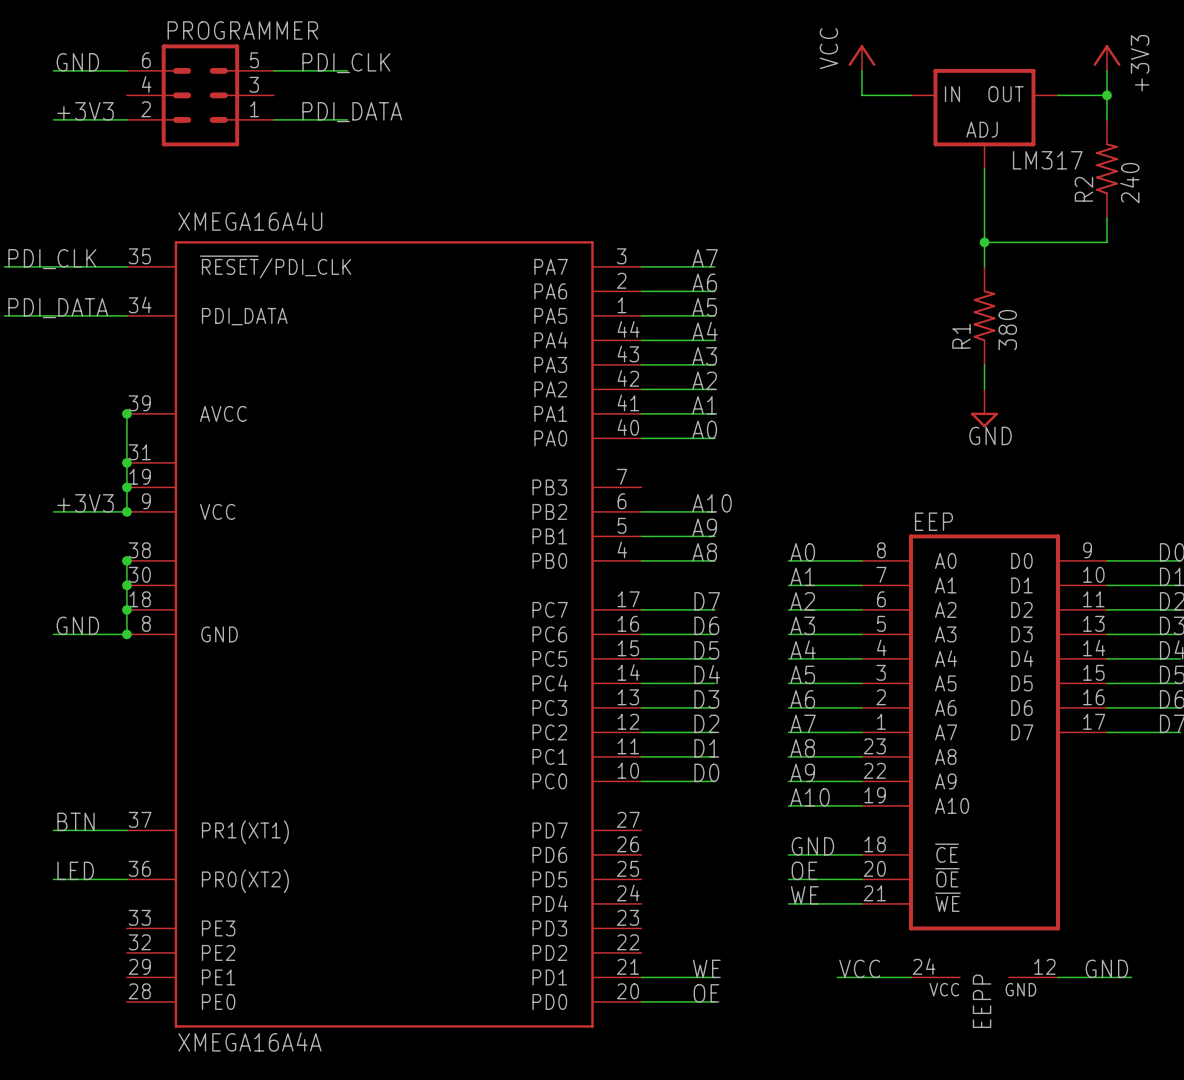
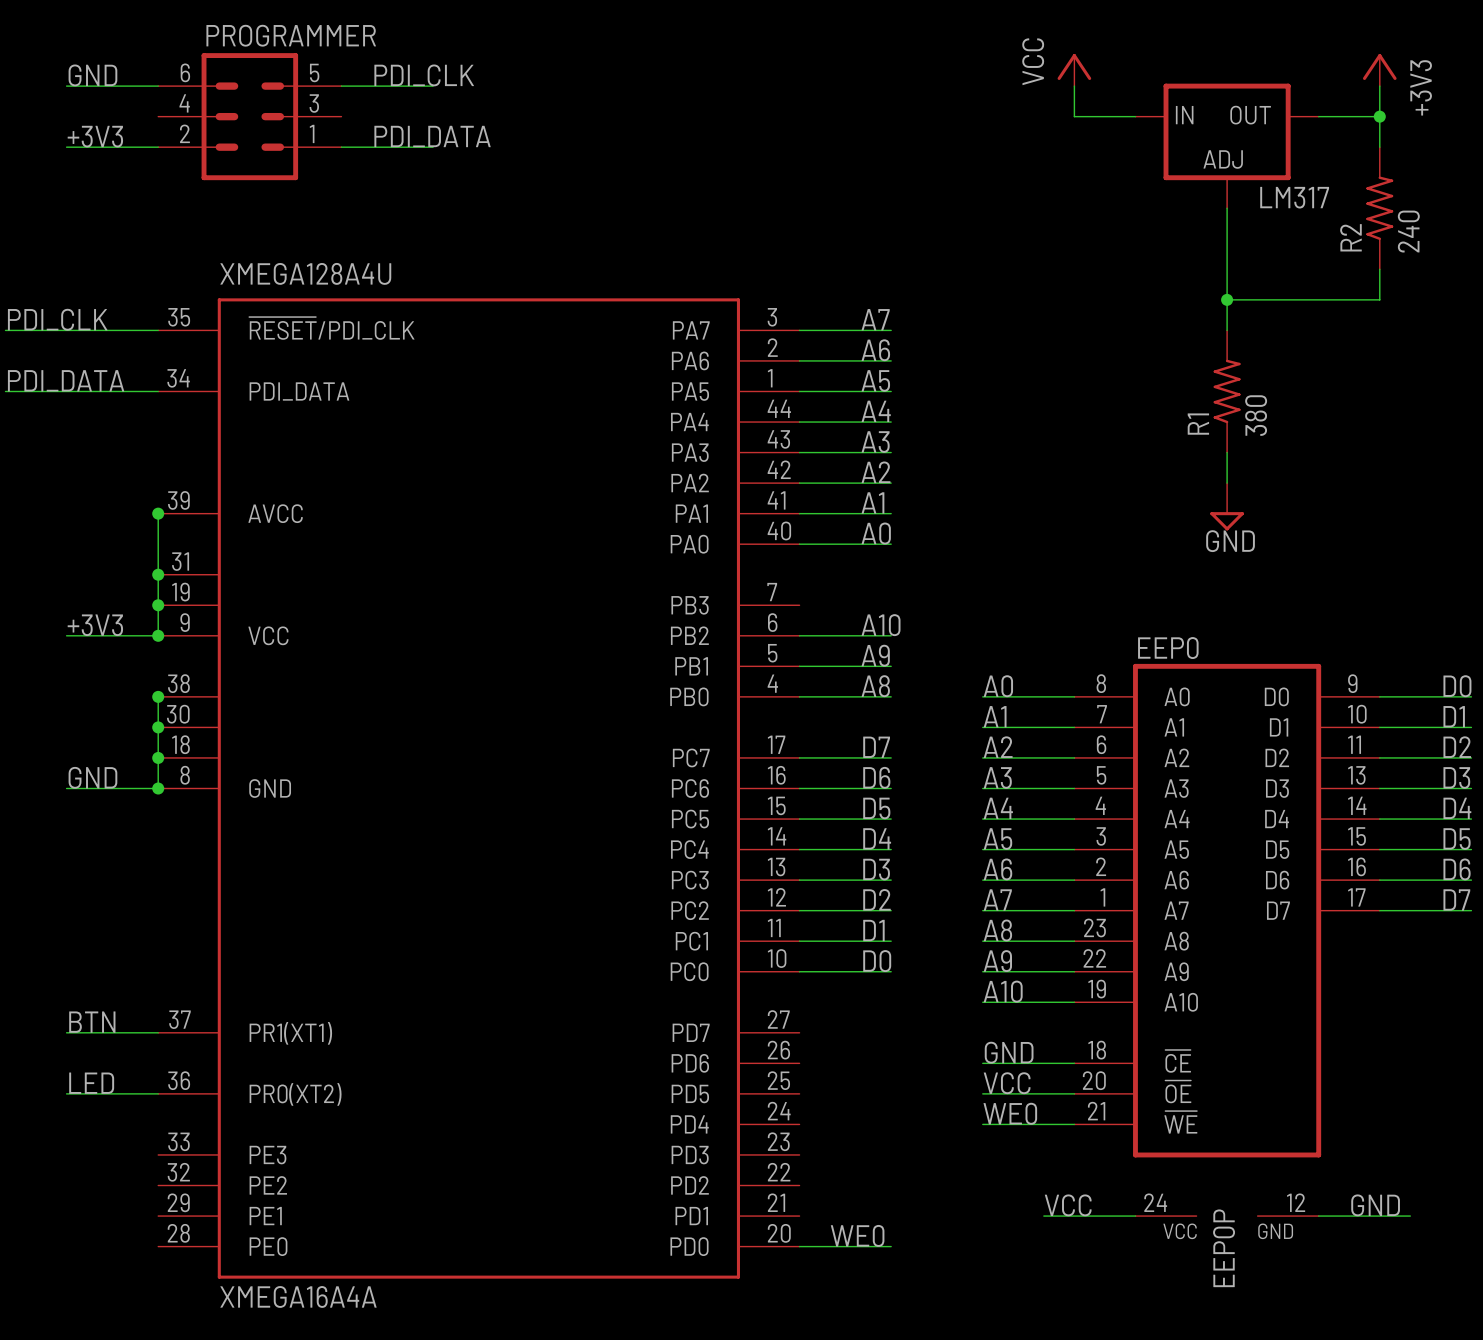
XMEGA16A4U name: XMEGA16A4U (250, 221) -> XMEGA128A4U (305, 273)
EEP name: EEP (933, 521) -> EEP0 (1168, 648)
label: OE (804, 870) -> VCC (1007, 1083)
label: WE (804, 895) -> WE0 (1010, 1113)
label: WE (706, 968) -> WE0 (857, 1235)
wire: (641, 977) (714, 977) -> none
label: OE (706, 993) -> none
EEPP name: EEPP (982, 1001) -> EEP0P (1224, 1248)

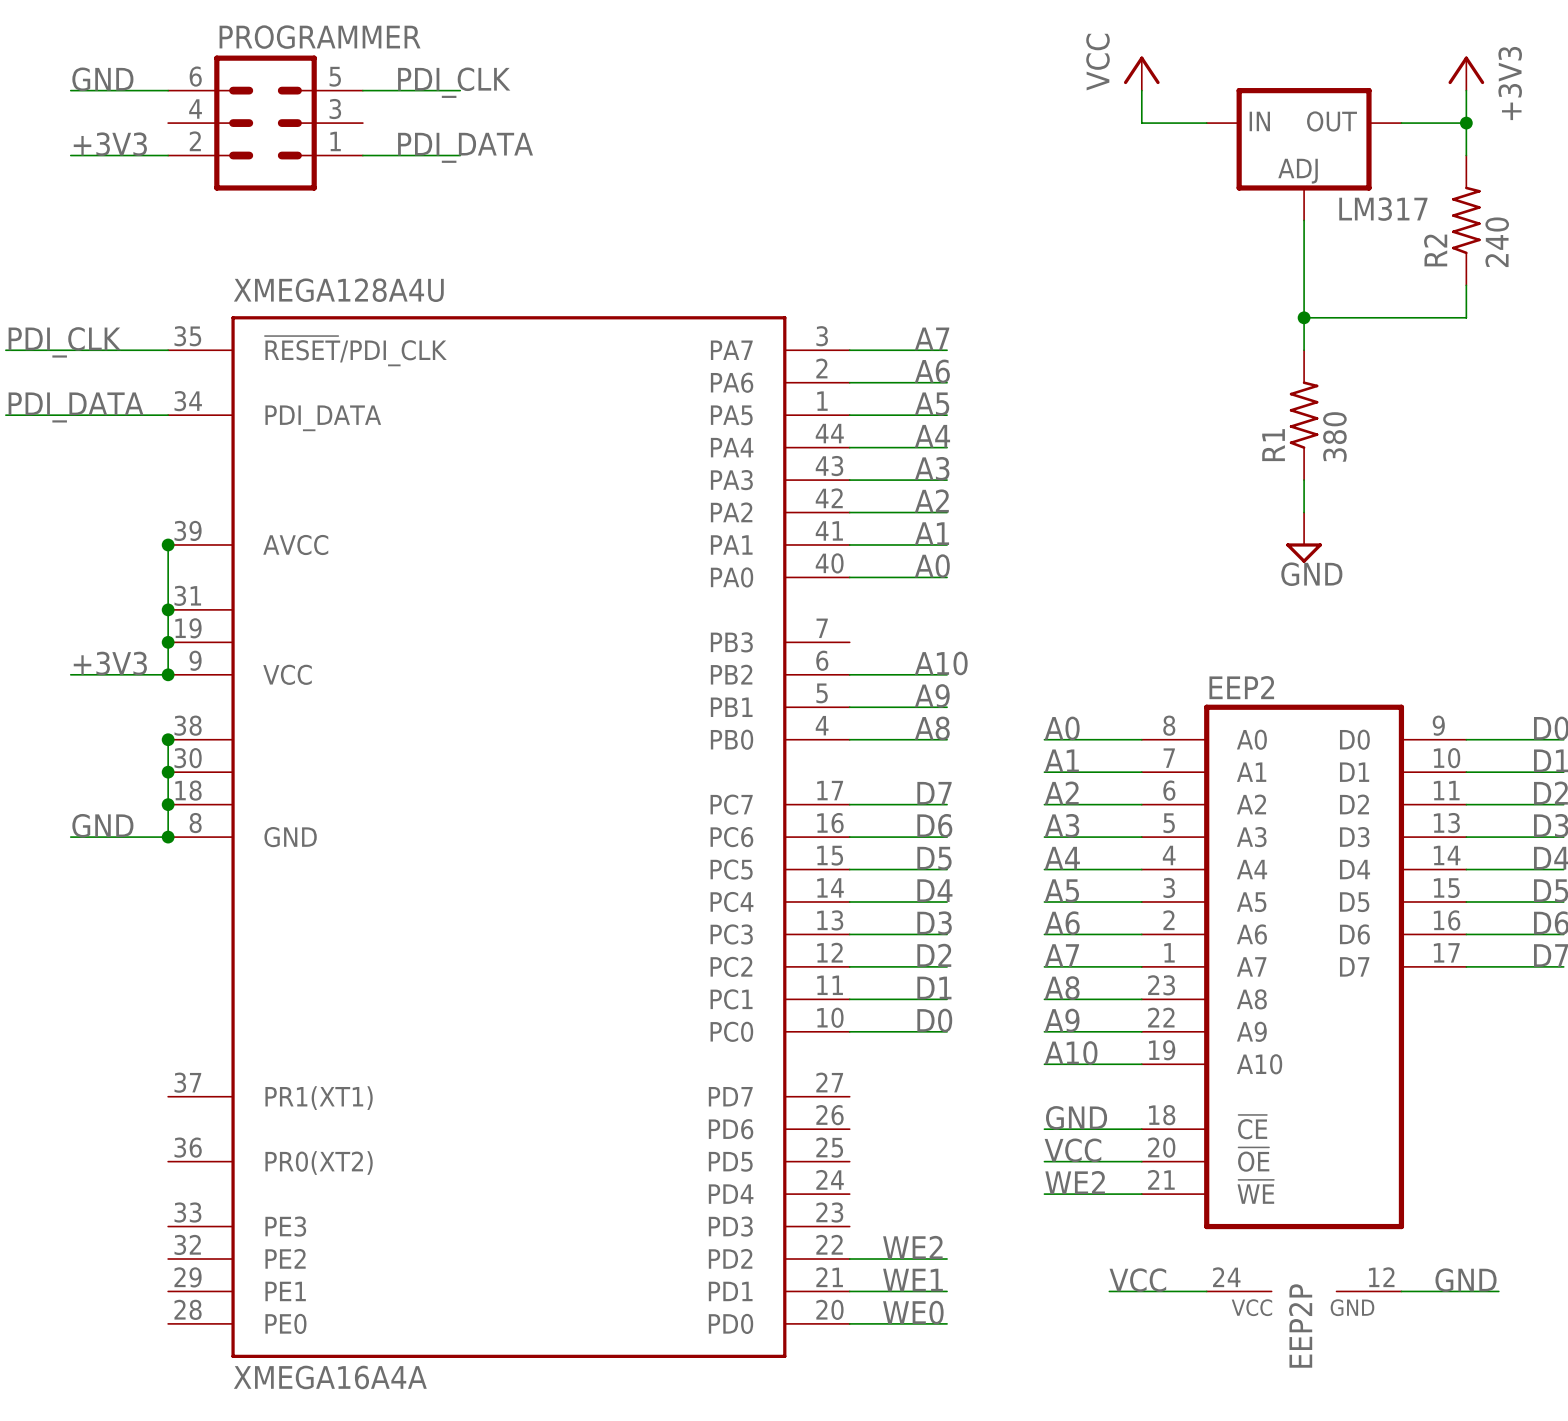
EEP0 name: EEP0 (1168, 648) -> EEP2 (1241, 687)
label: BTN (92, 1022) -> none
wire: (66, 1032) (158, 1032) -> none
label: LED (91, 1083) -> none
wire: (66, 1093) (158, 1093) -> none
label: WE0 (1010, 1113) -> WE2 (1075, 1182)
label: none -> WE2 (912, 1247)
wire: none -> (849, 1259) (947, 1259)
label: none -> WE1 (912, 1280)
wire: none -> (849, 1291) (947, 1291)
EEP0P name: EEP0P (1224, 1248) -> EEP2P (1300, 1326)

